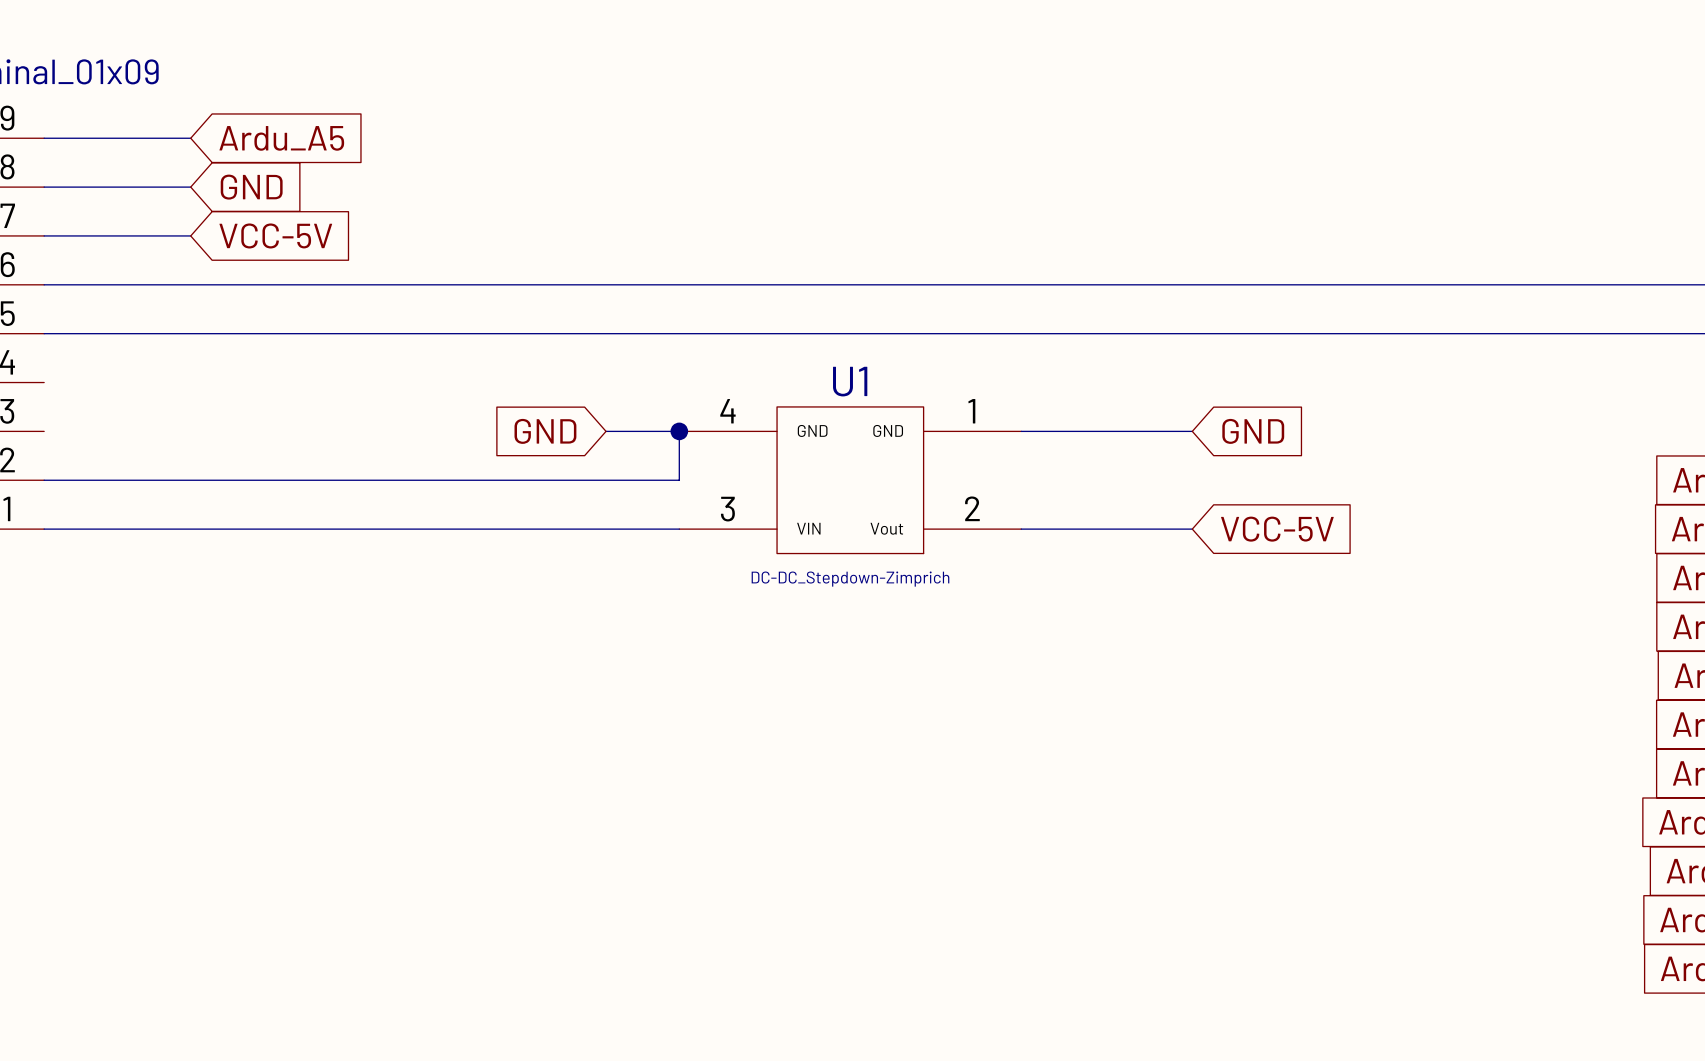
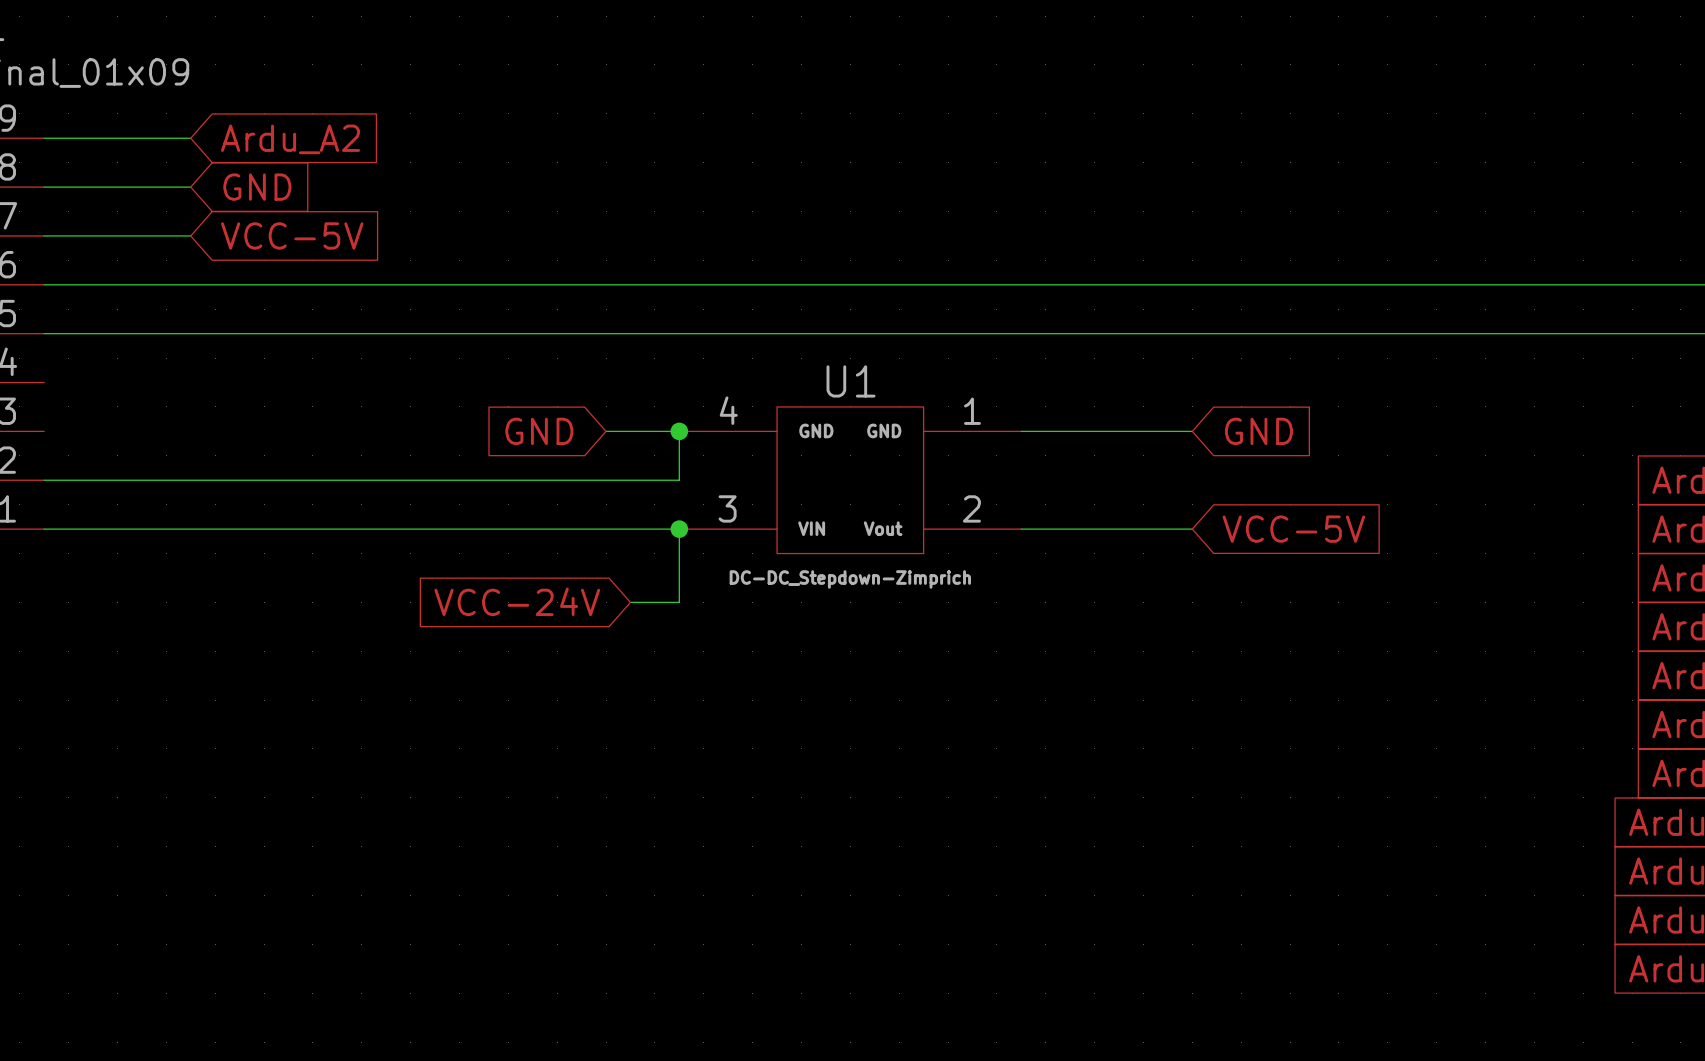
global label: Ardu_A5 (281, 138) -> Ardu_A2 (290, 139)
wire: none -> (679, 529) (679, 602) (630, 602)
junction: none -> (679, 529)
global label: none -> VCC-24V (517, 601)

